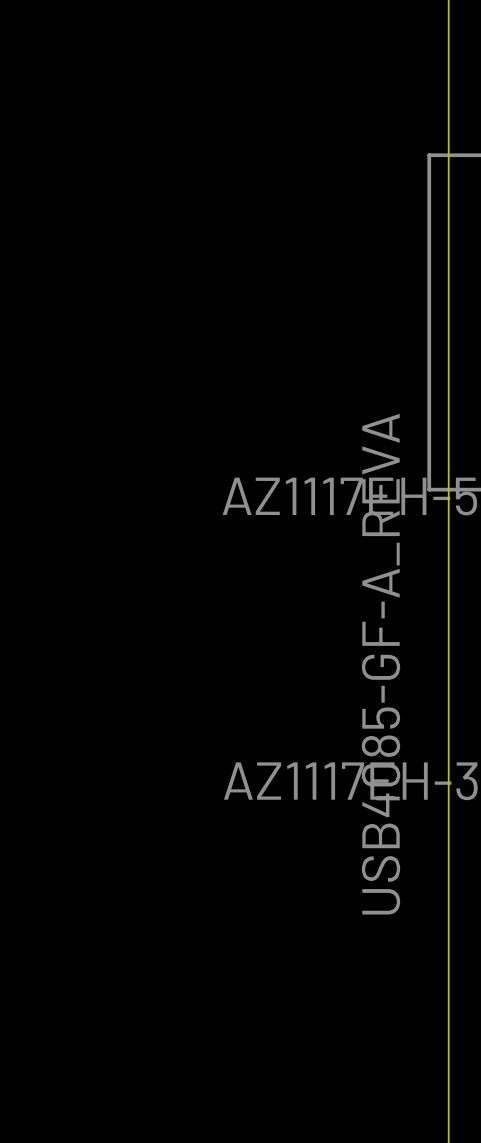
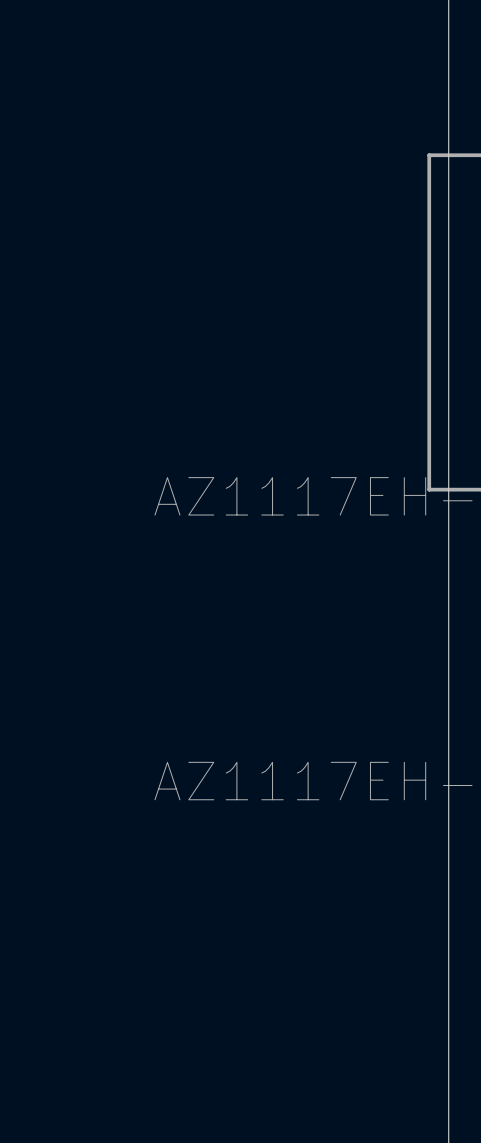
part value: USB4085-GF-A_REVA (381, 664) -> none

